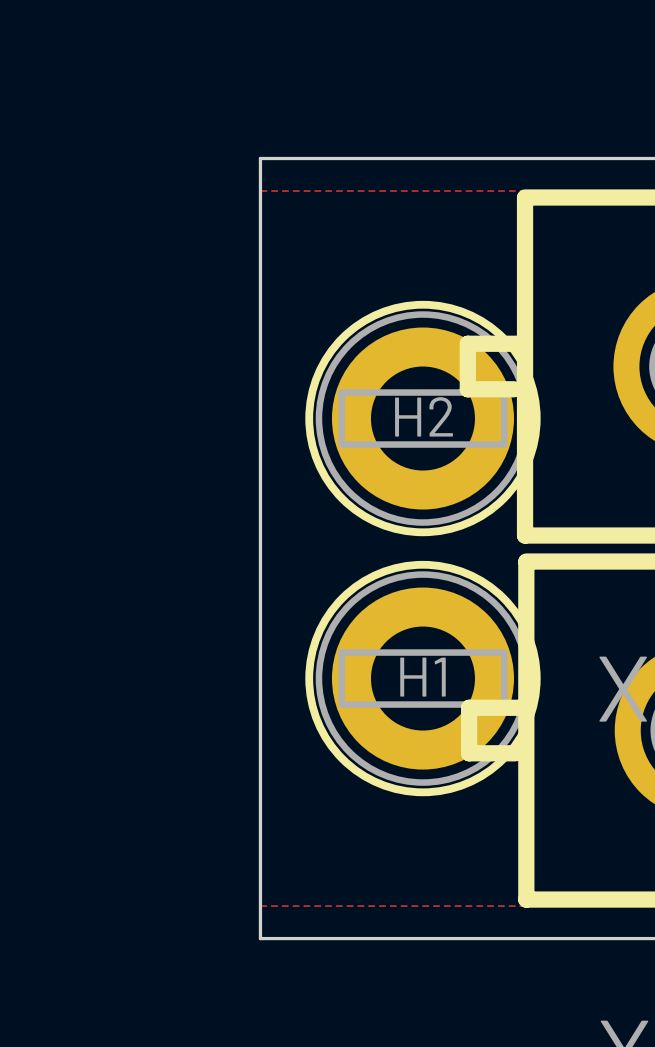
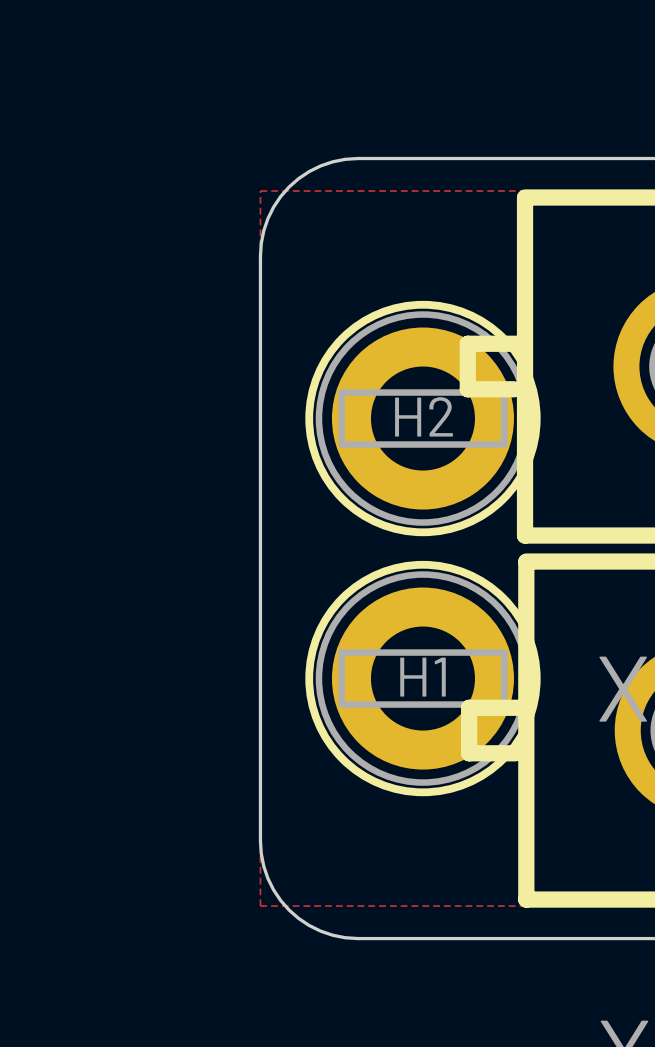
board edge: (357, 158) (260, 158) (260, 256) -> (357, 158) (332, 161) (320, 165) (309, 171) (289, 187) (280, 196) (267, 218) (261, 243) (260, 256)
board edge: (260, 841) (260, 938) (357, 938) -> (260, 841) (261, 853) (267, 878) (280, 900) (289, 910) (309, 925) (320, 931) (332, 935) (357, 938)

